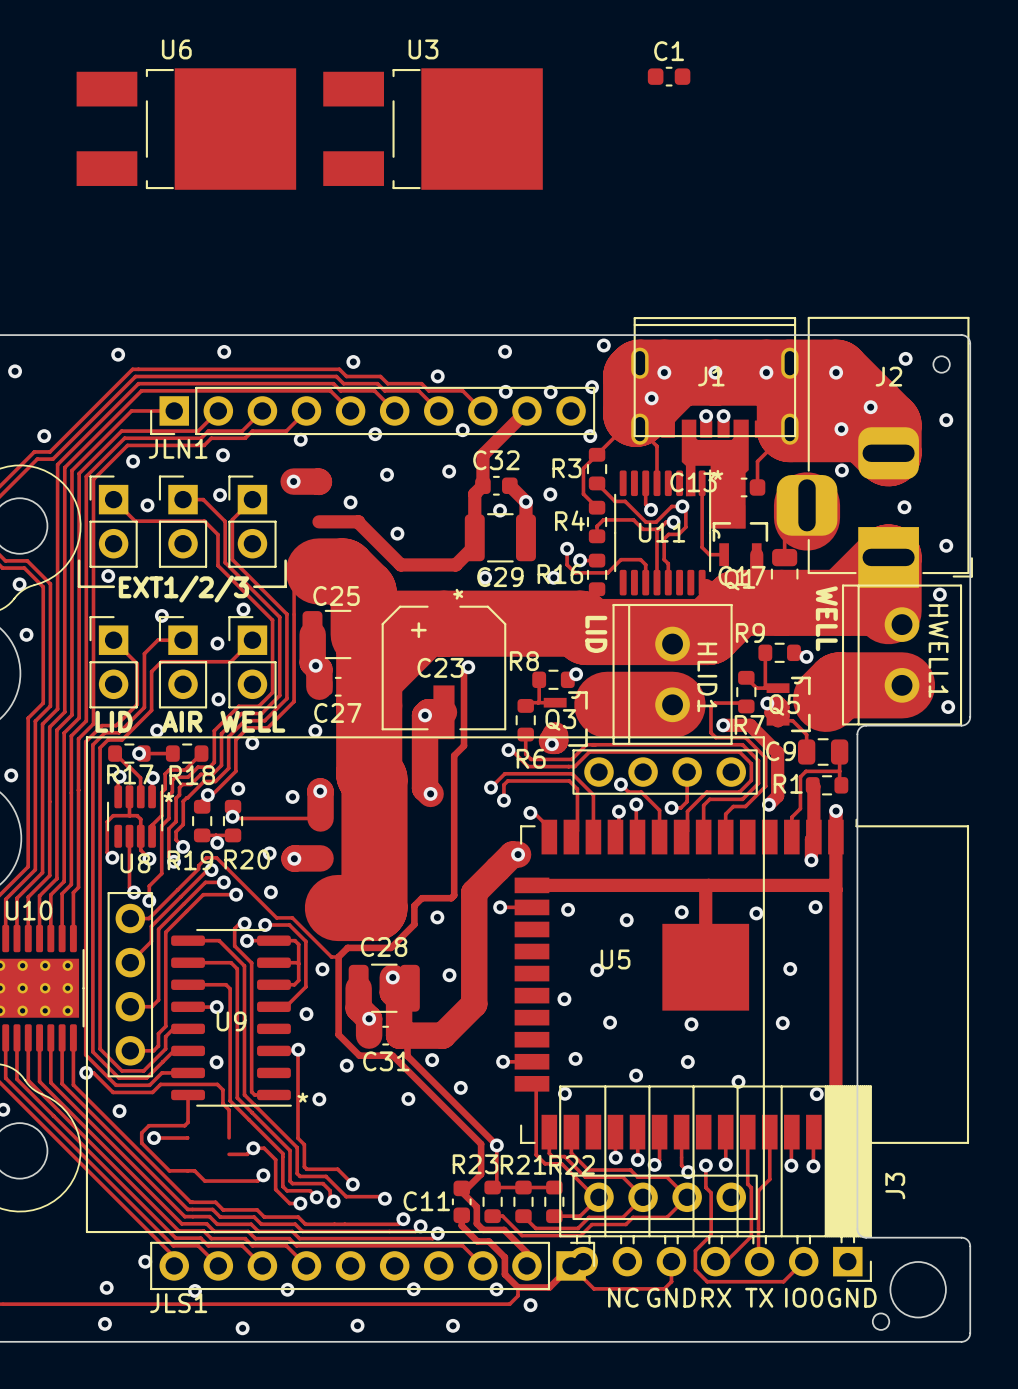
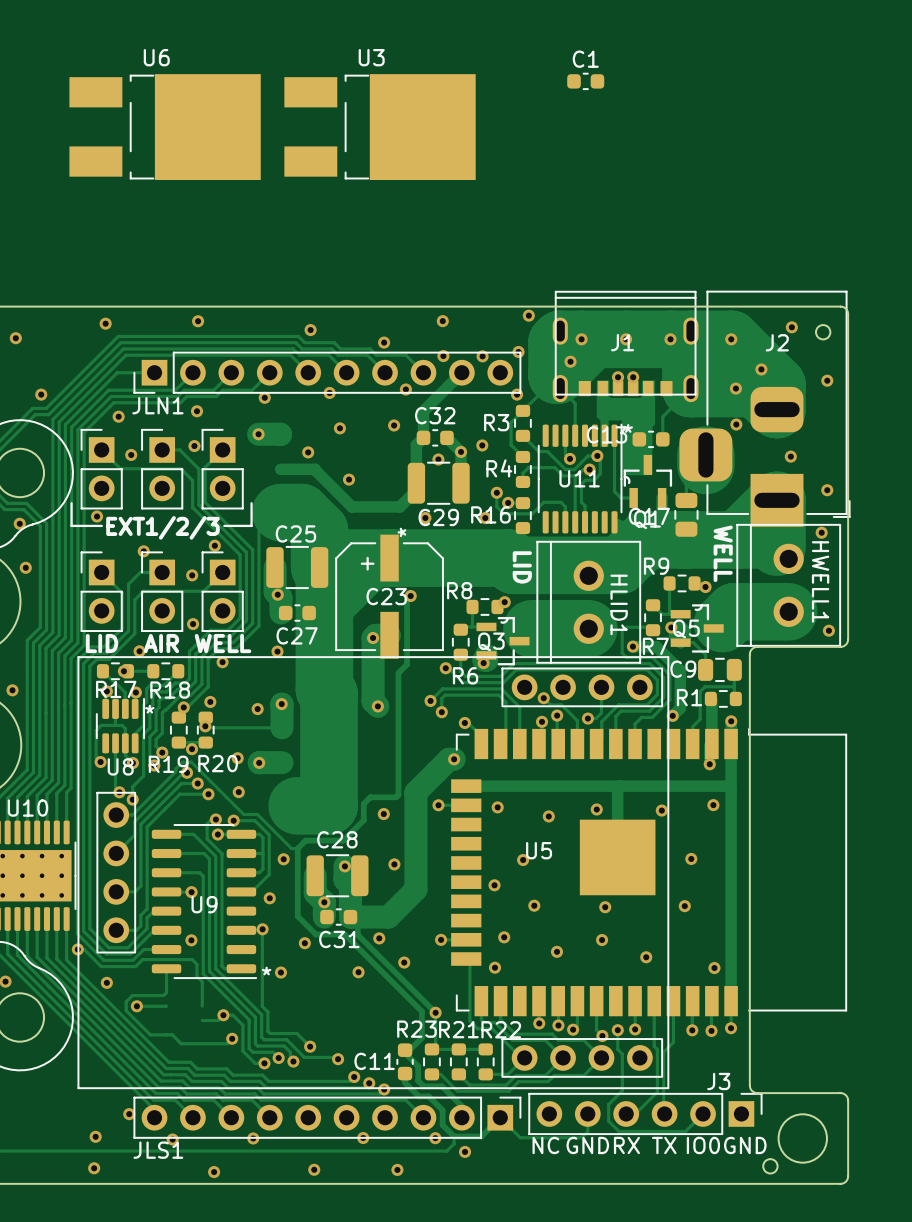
J3 footprint: [559, 1085, 872, 1282] -> [528, 1092, 763, 1136]
J3 name position: J3 (895, 1186) -> J3 (718, 1081)

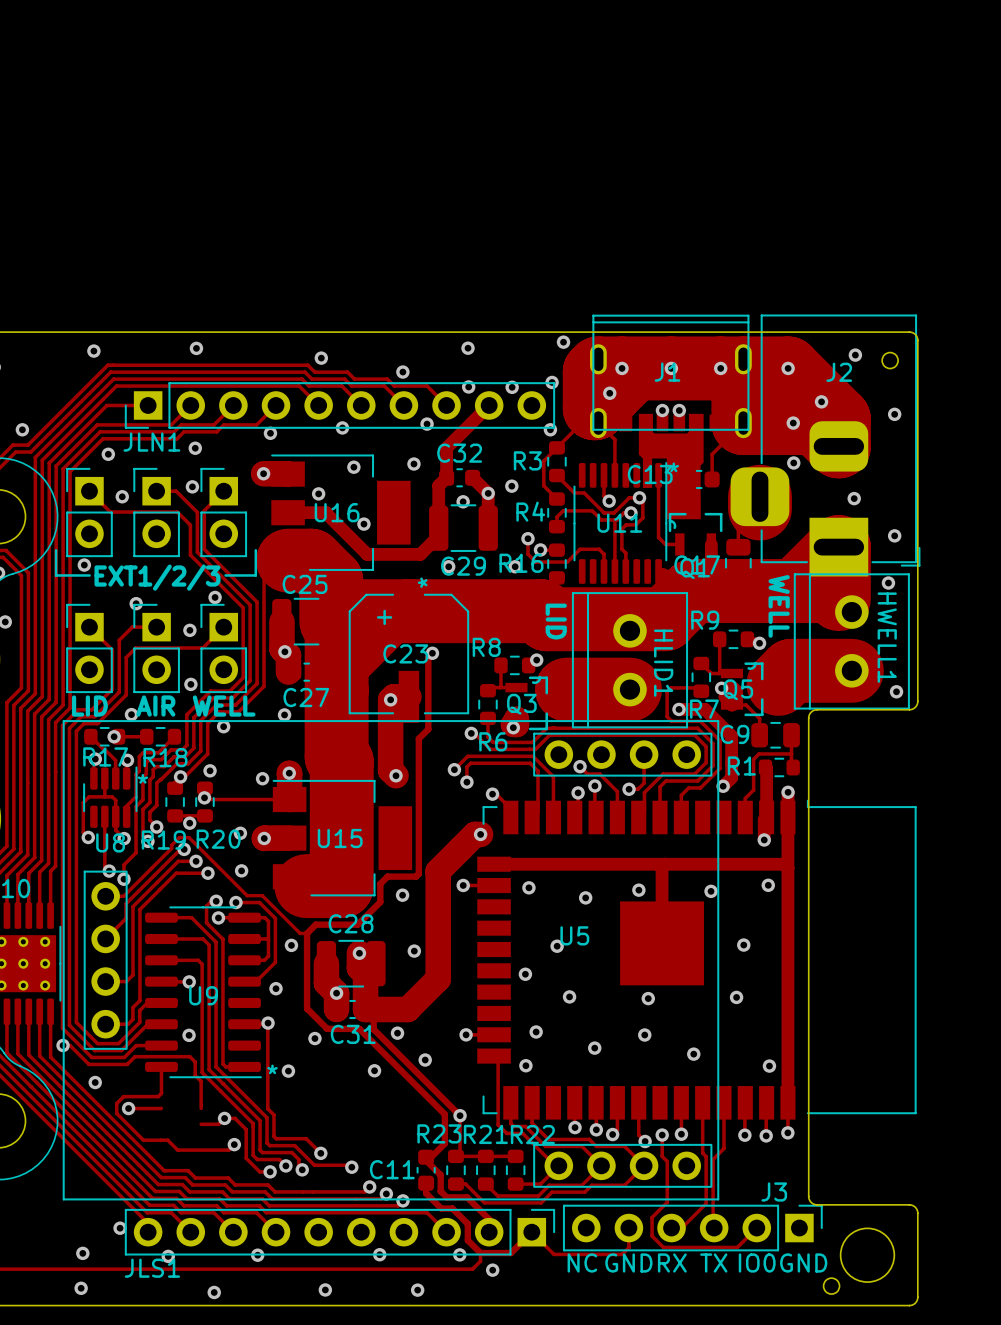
C1: (585, 81) -> none
U6: (165, 127) -> none
U3: (380, 127) -> none
U16: none -> (340, 512)
U15: none -> (342, 838)

